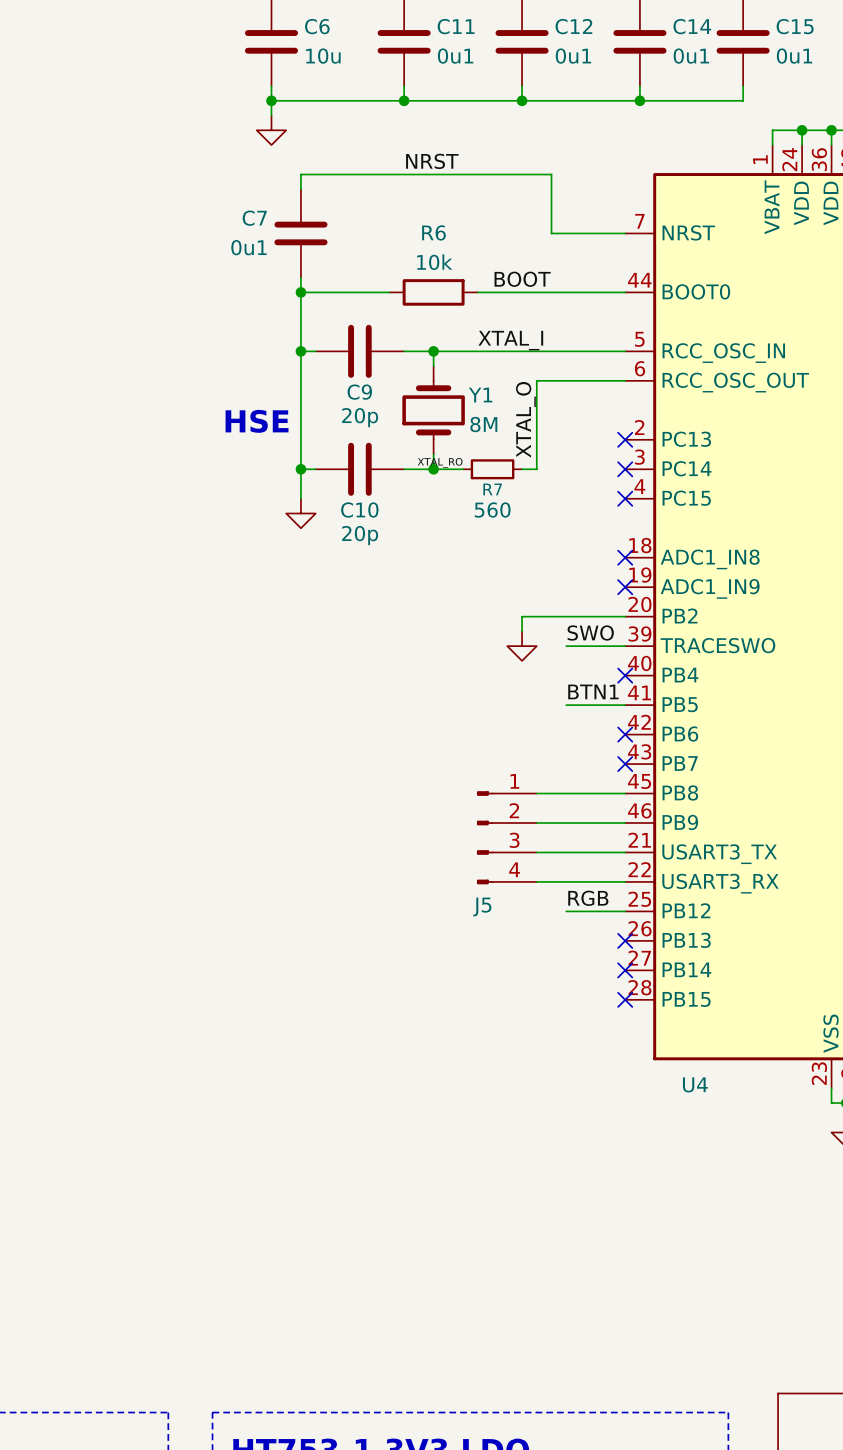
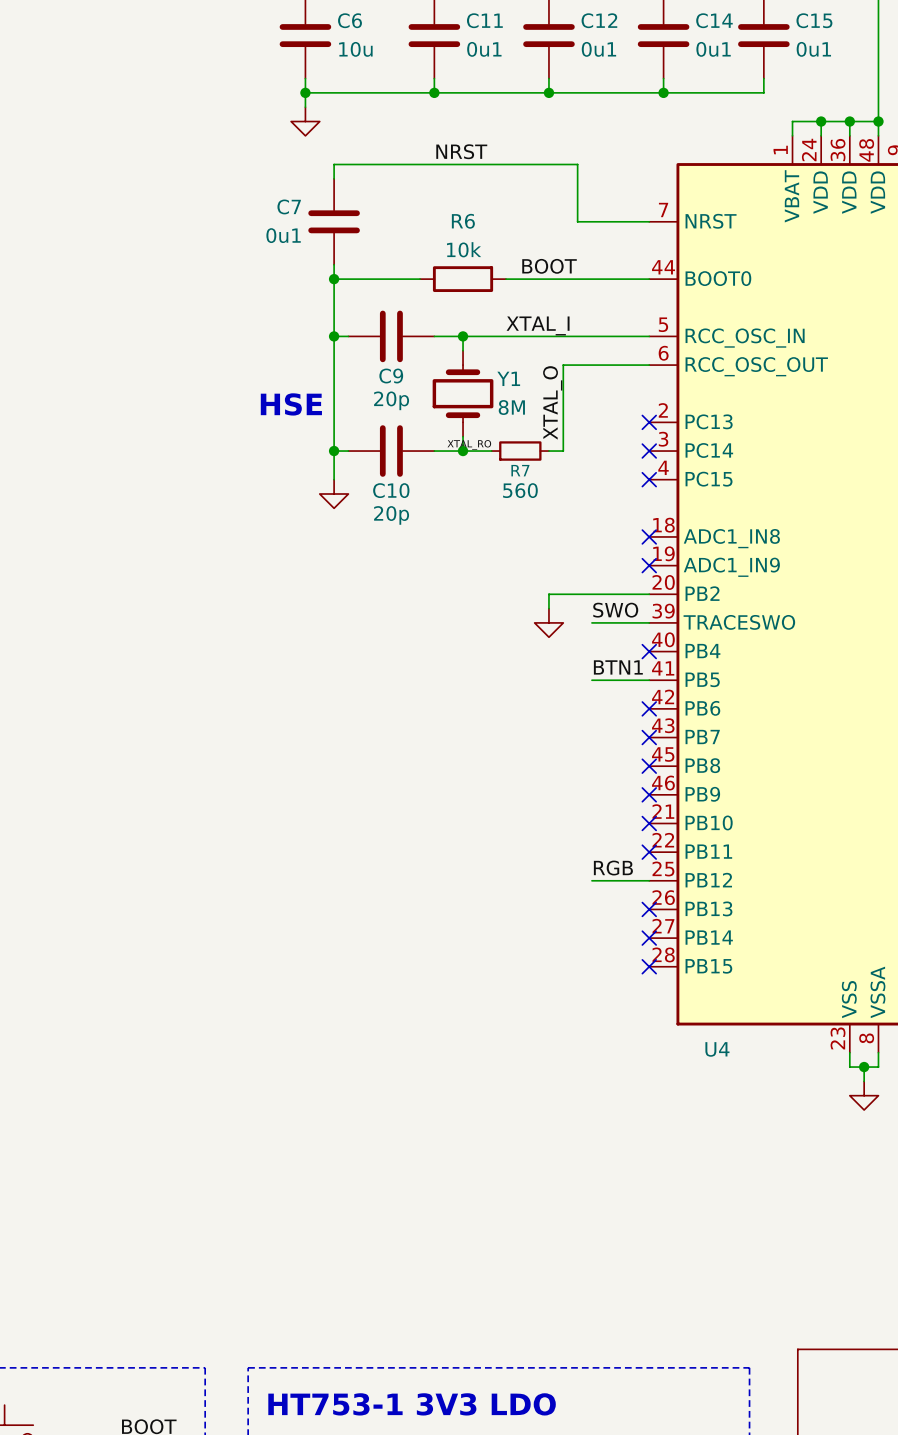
wire: (536, 793) (625, 793) -> none
no-connect mark: none -> (649, 766)
wire: (536, 823) (625, 823) -> none
no-connect mark: none -> (649, 794)
J5: (506, 837) -> none
wire: (536, 852) (625, 852) -> none
no-connect mark: none -> (649, 823)
U4 pin name: USART3_TX (719, 854) -> PB10 (709, 822)
wire: (536, 881) (625, 881) -> none
no-connect mark: none -> (649, 852)
U4 pin name: USART3_RX (720, 883) -> PB11 (708, 851)

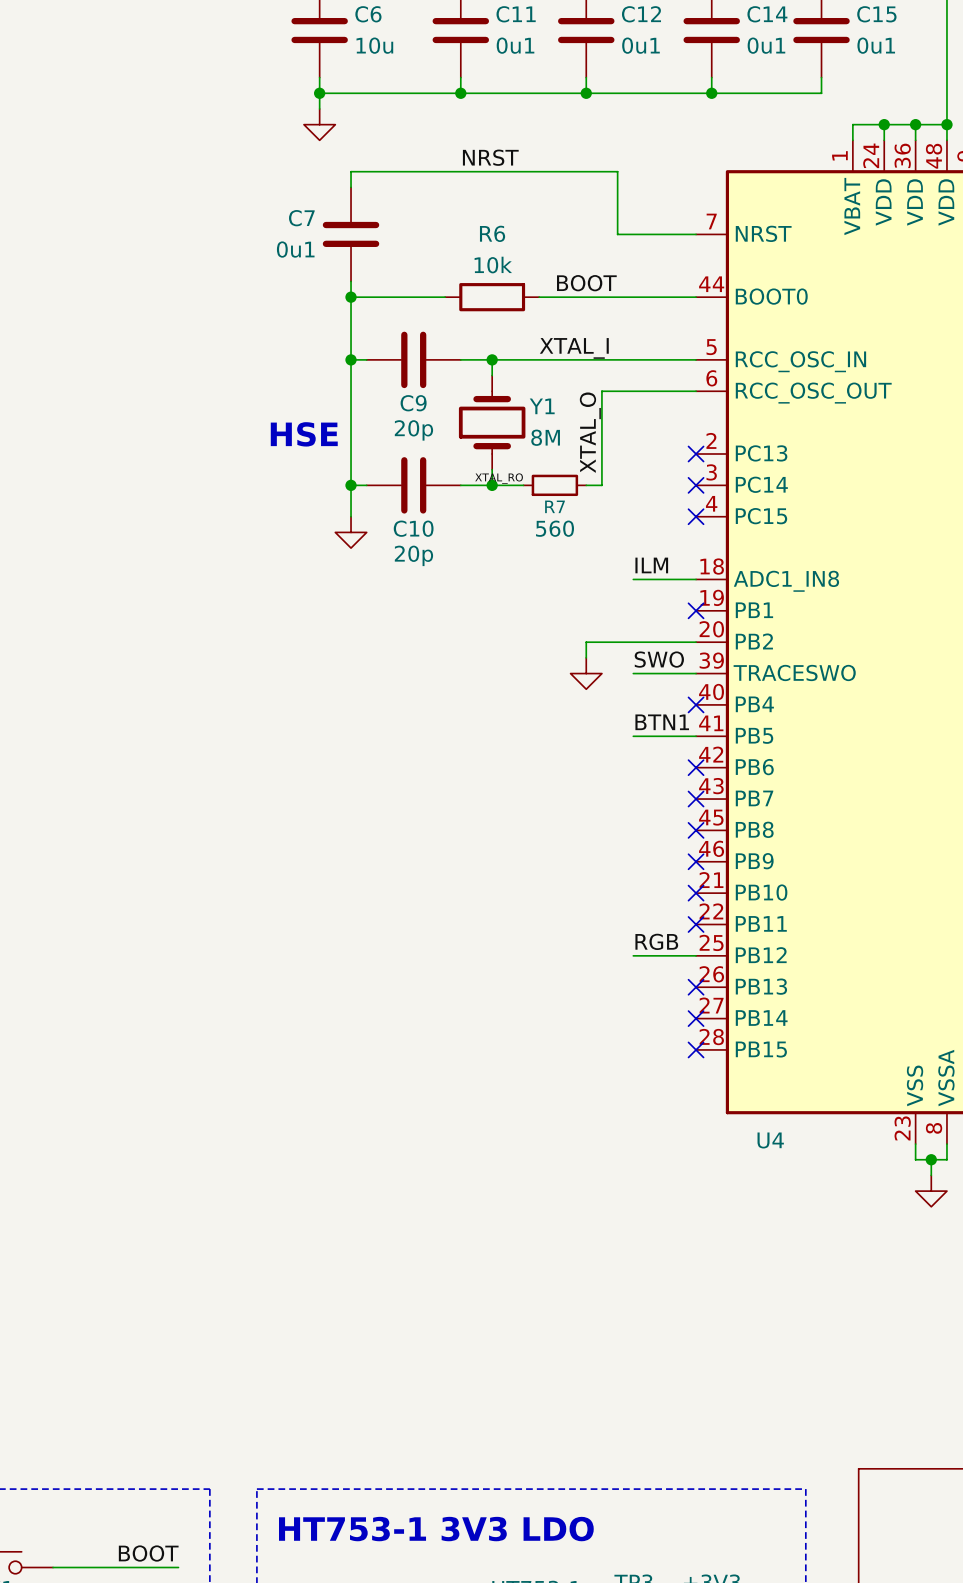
label: none -> ILM (651, 565)
wire: none -> (633, 579) (696, 579)
no-connect mark: (649, 536) -> none
U4 pin name: ADC1_IN9 (731, 567) -> PB1 (754, 610)

